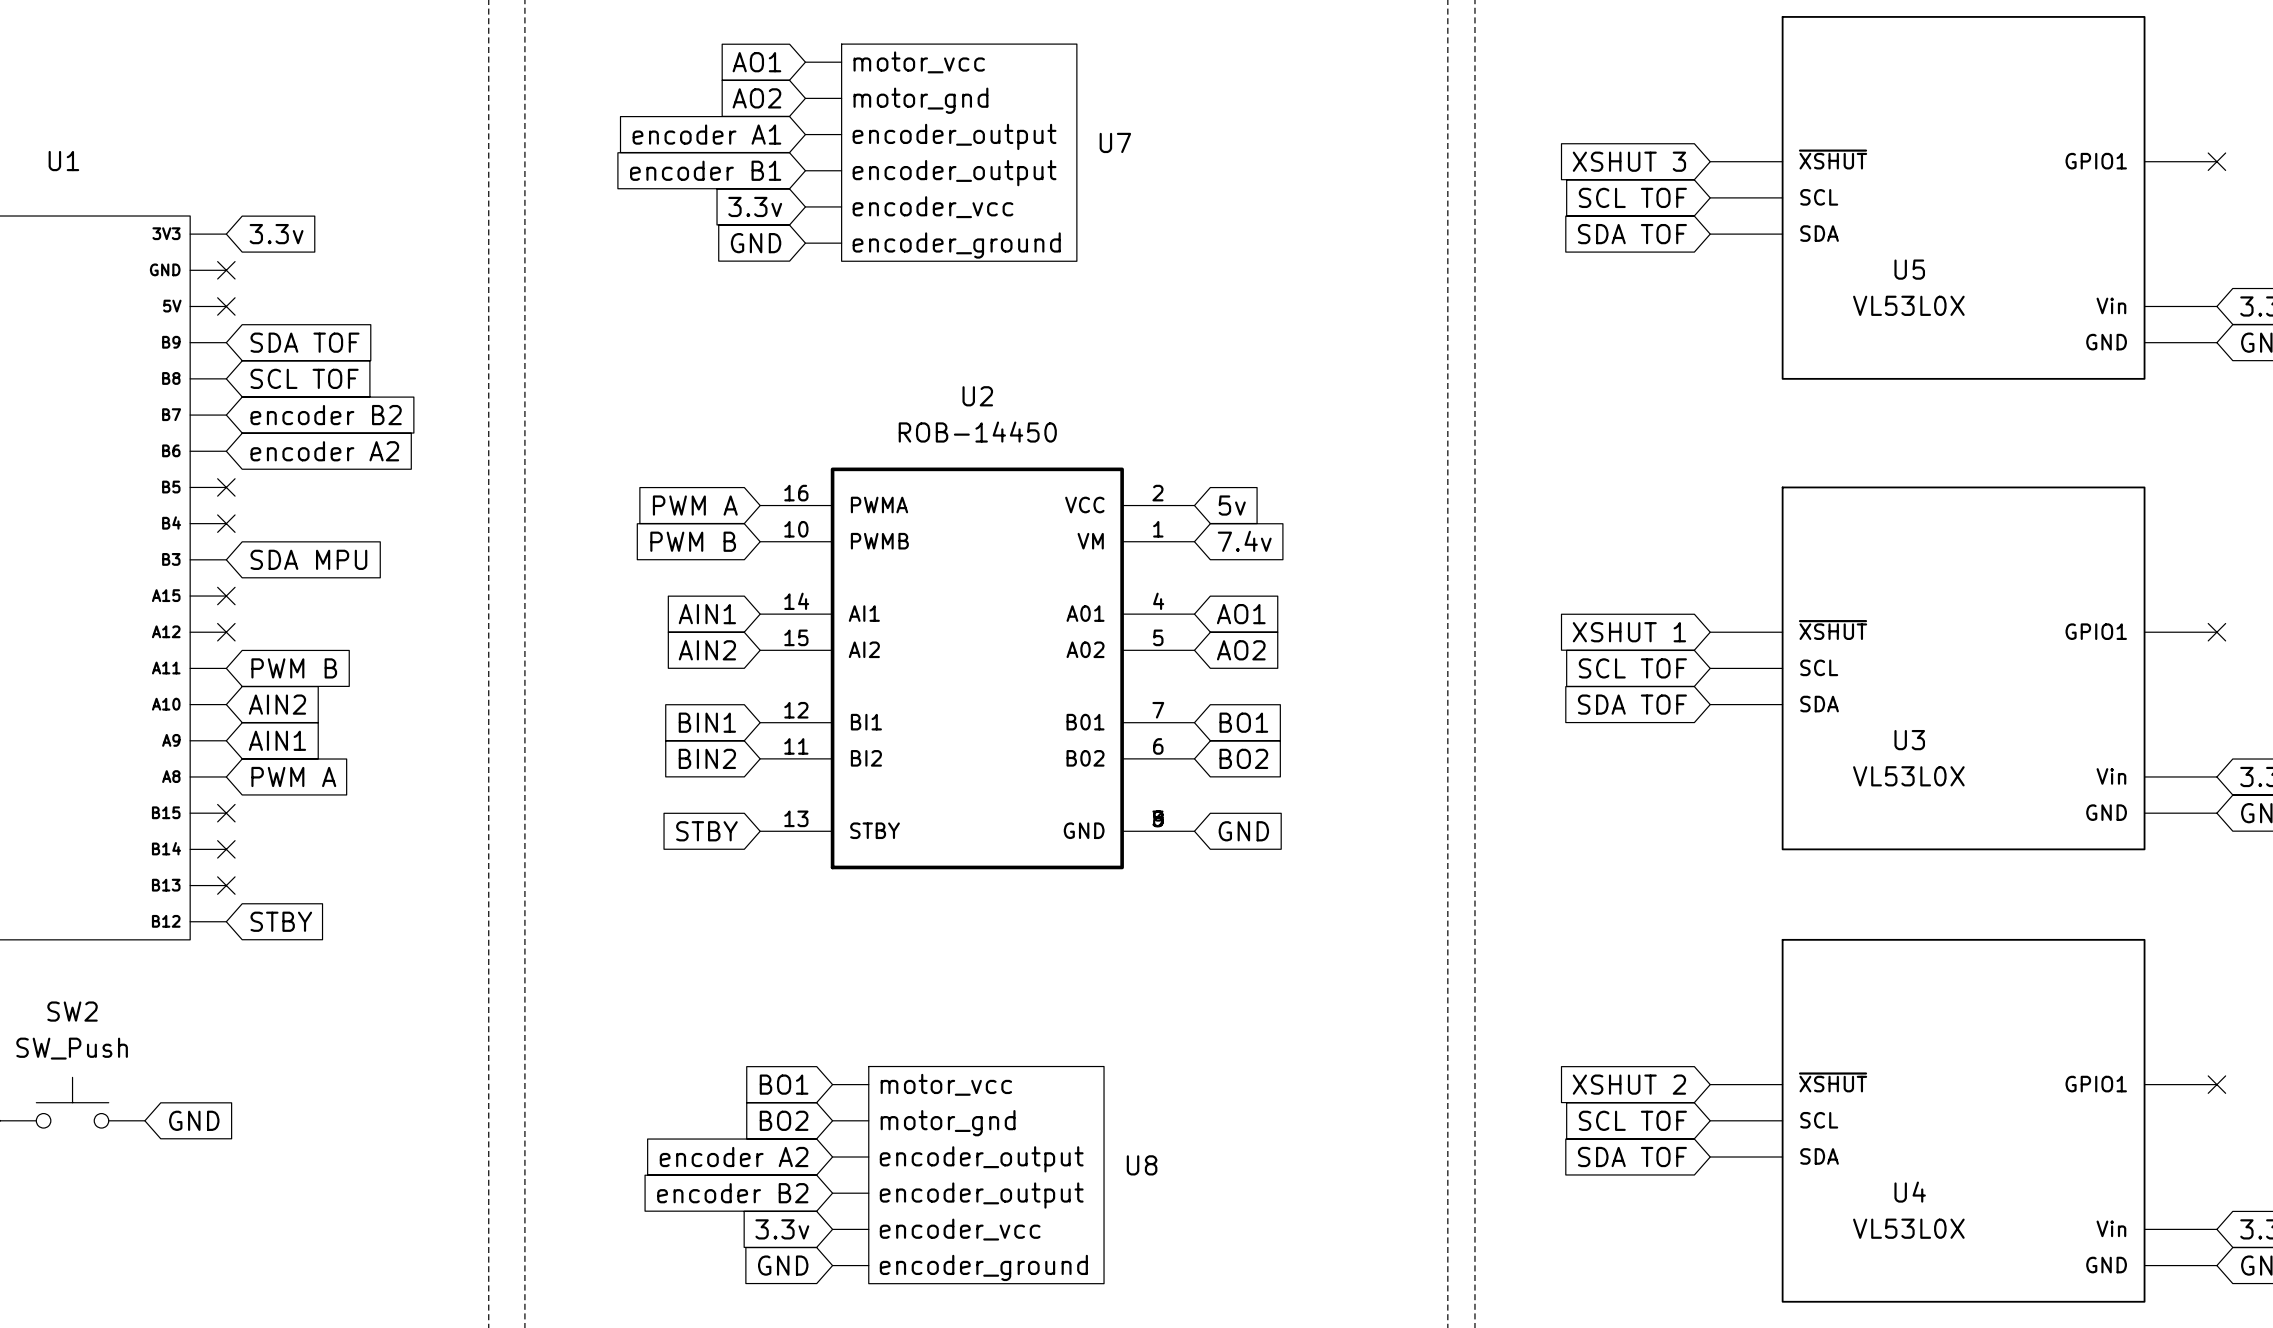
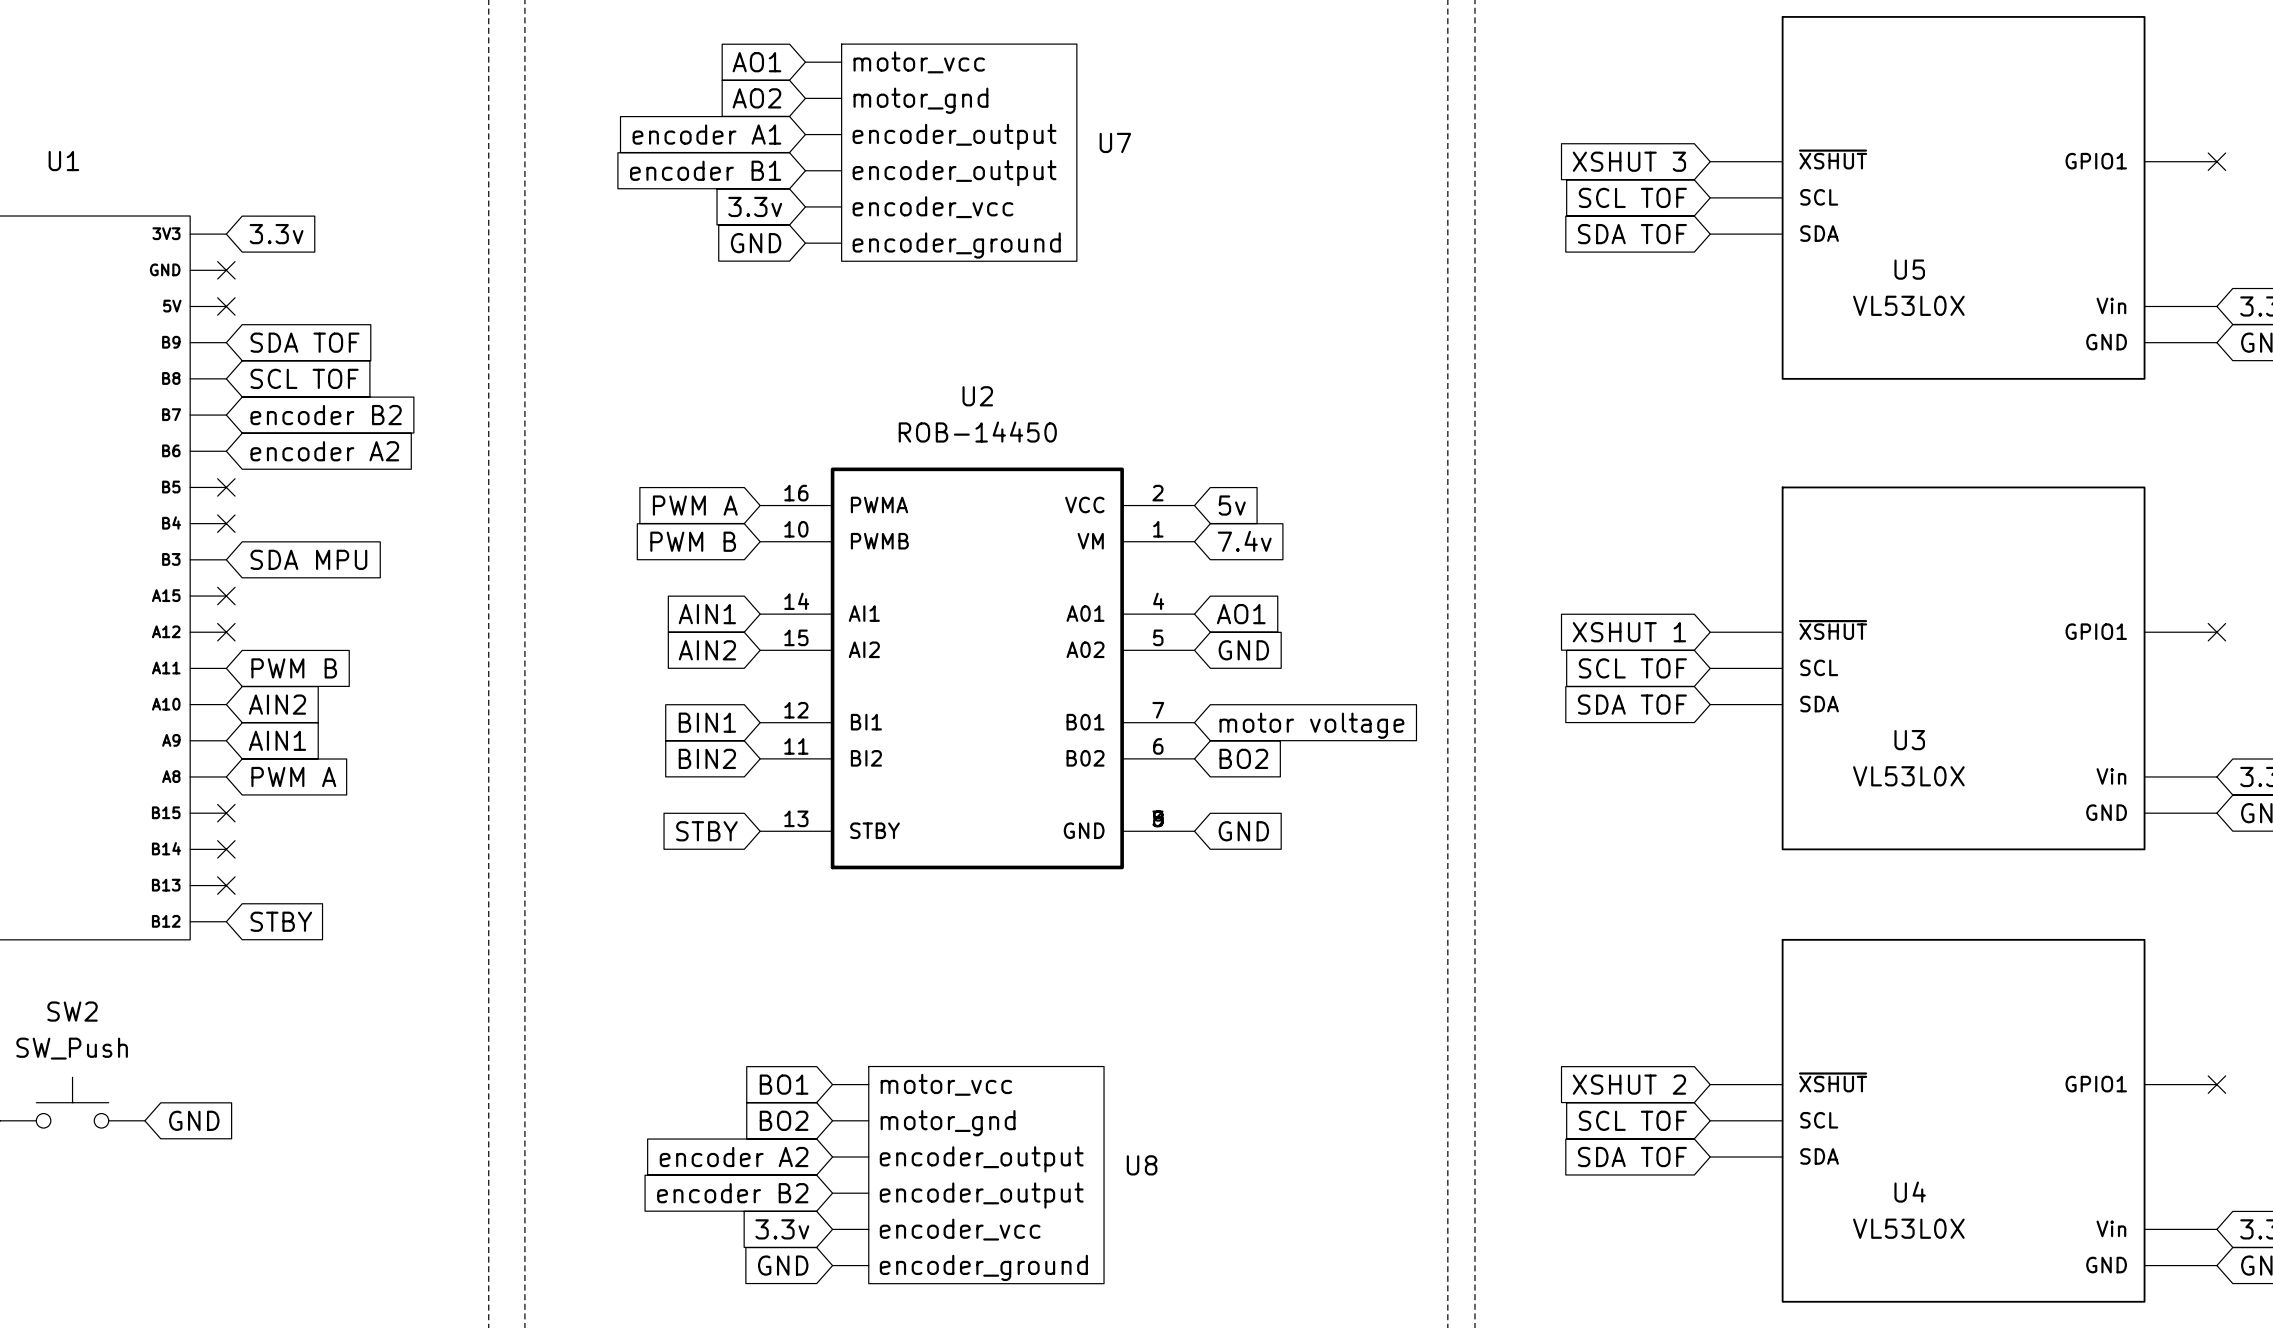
global label: AO2 (1241, 650) -> GND (1243, 650)
global label: BO1 (1243, 722) -> motor voltage (1311, 725)

